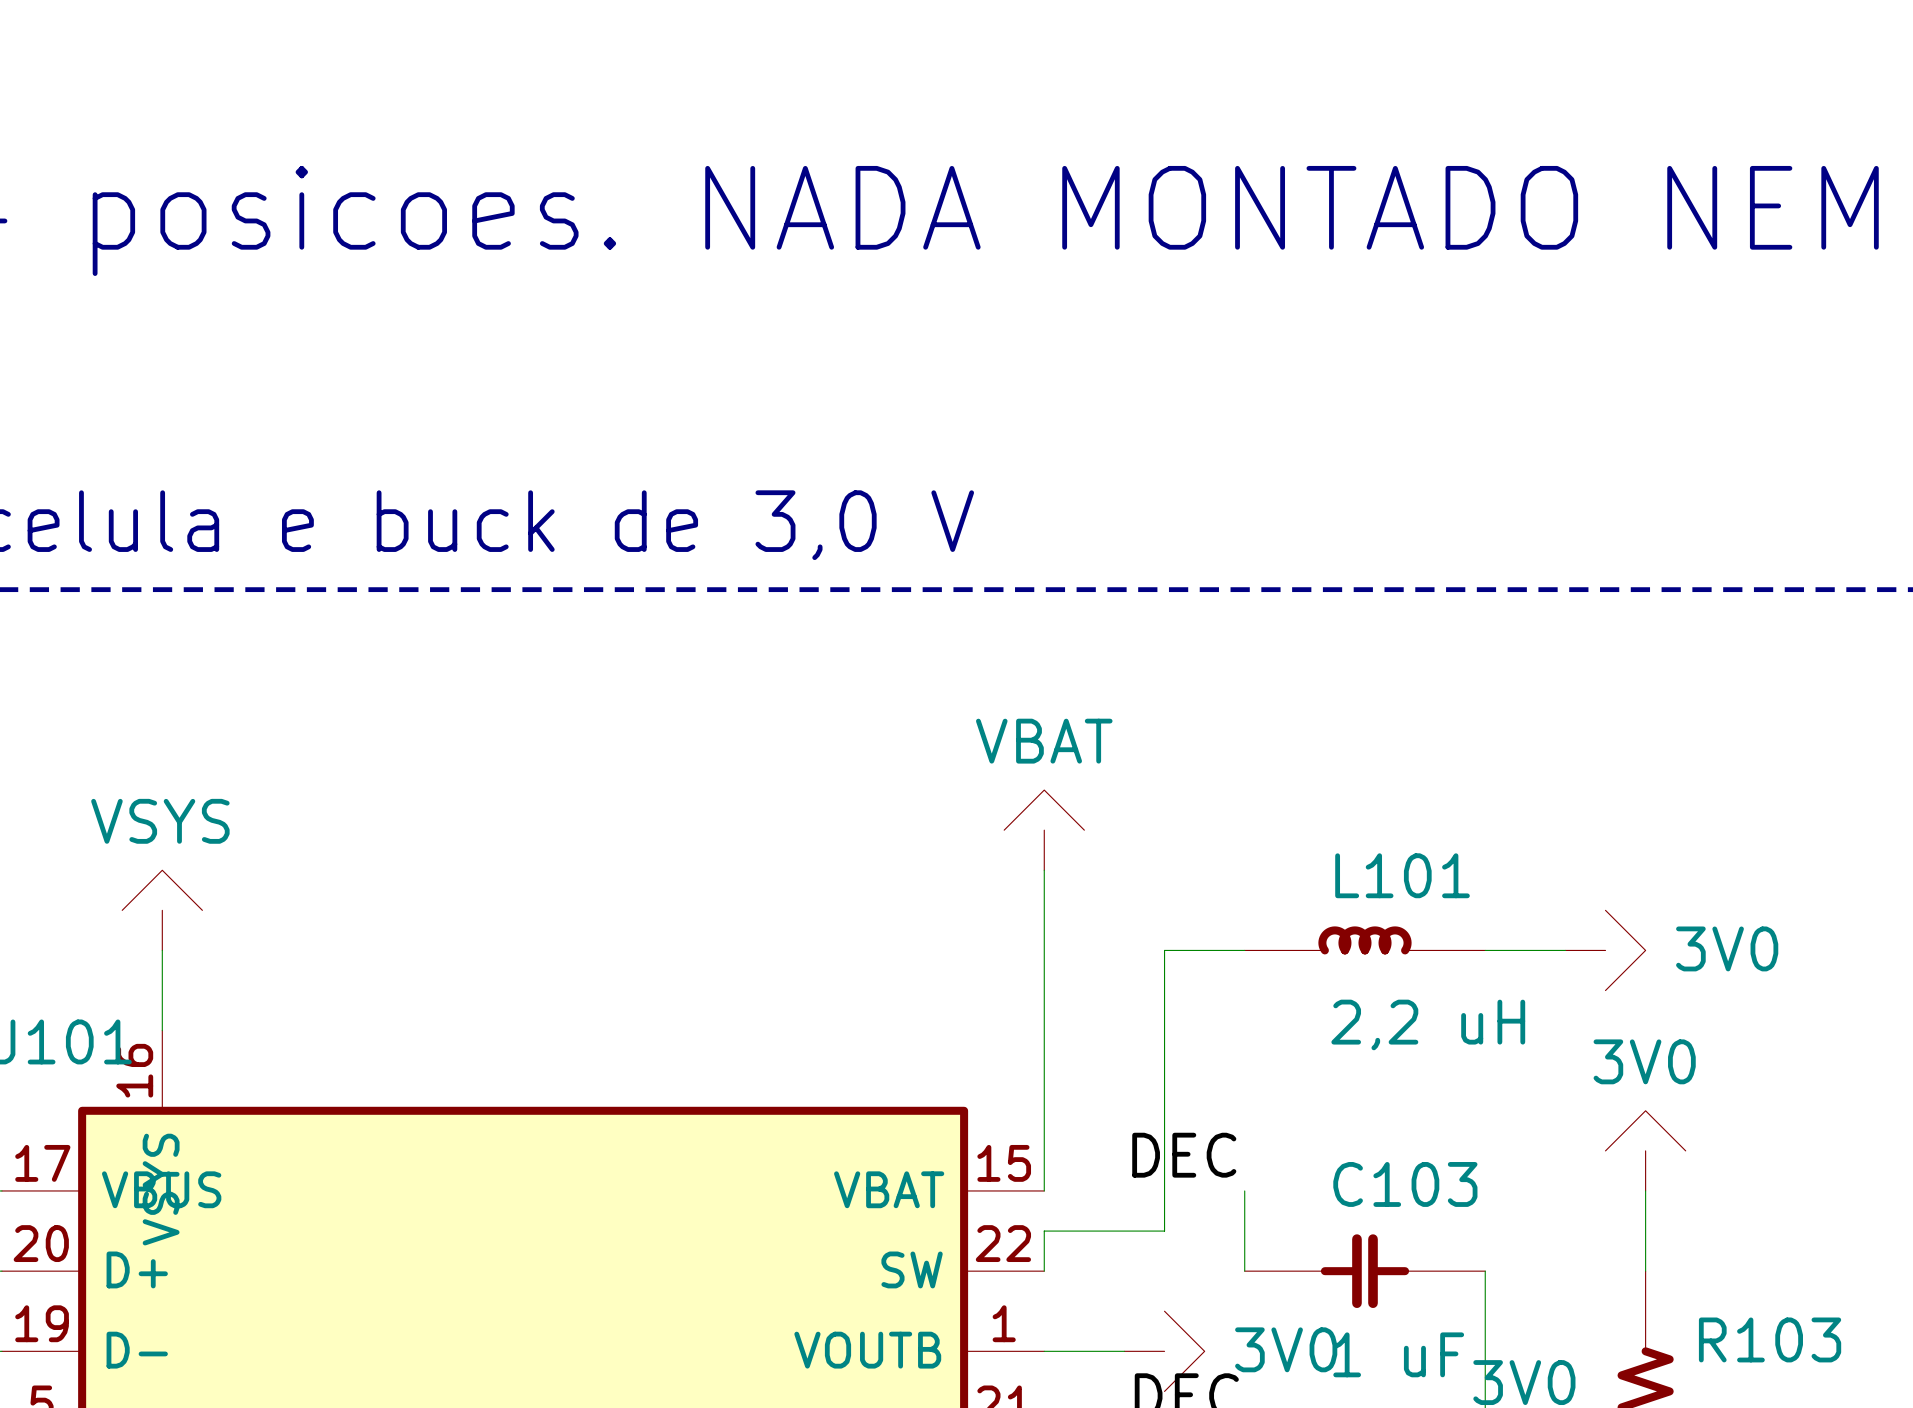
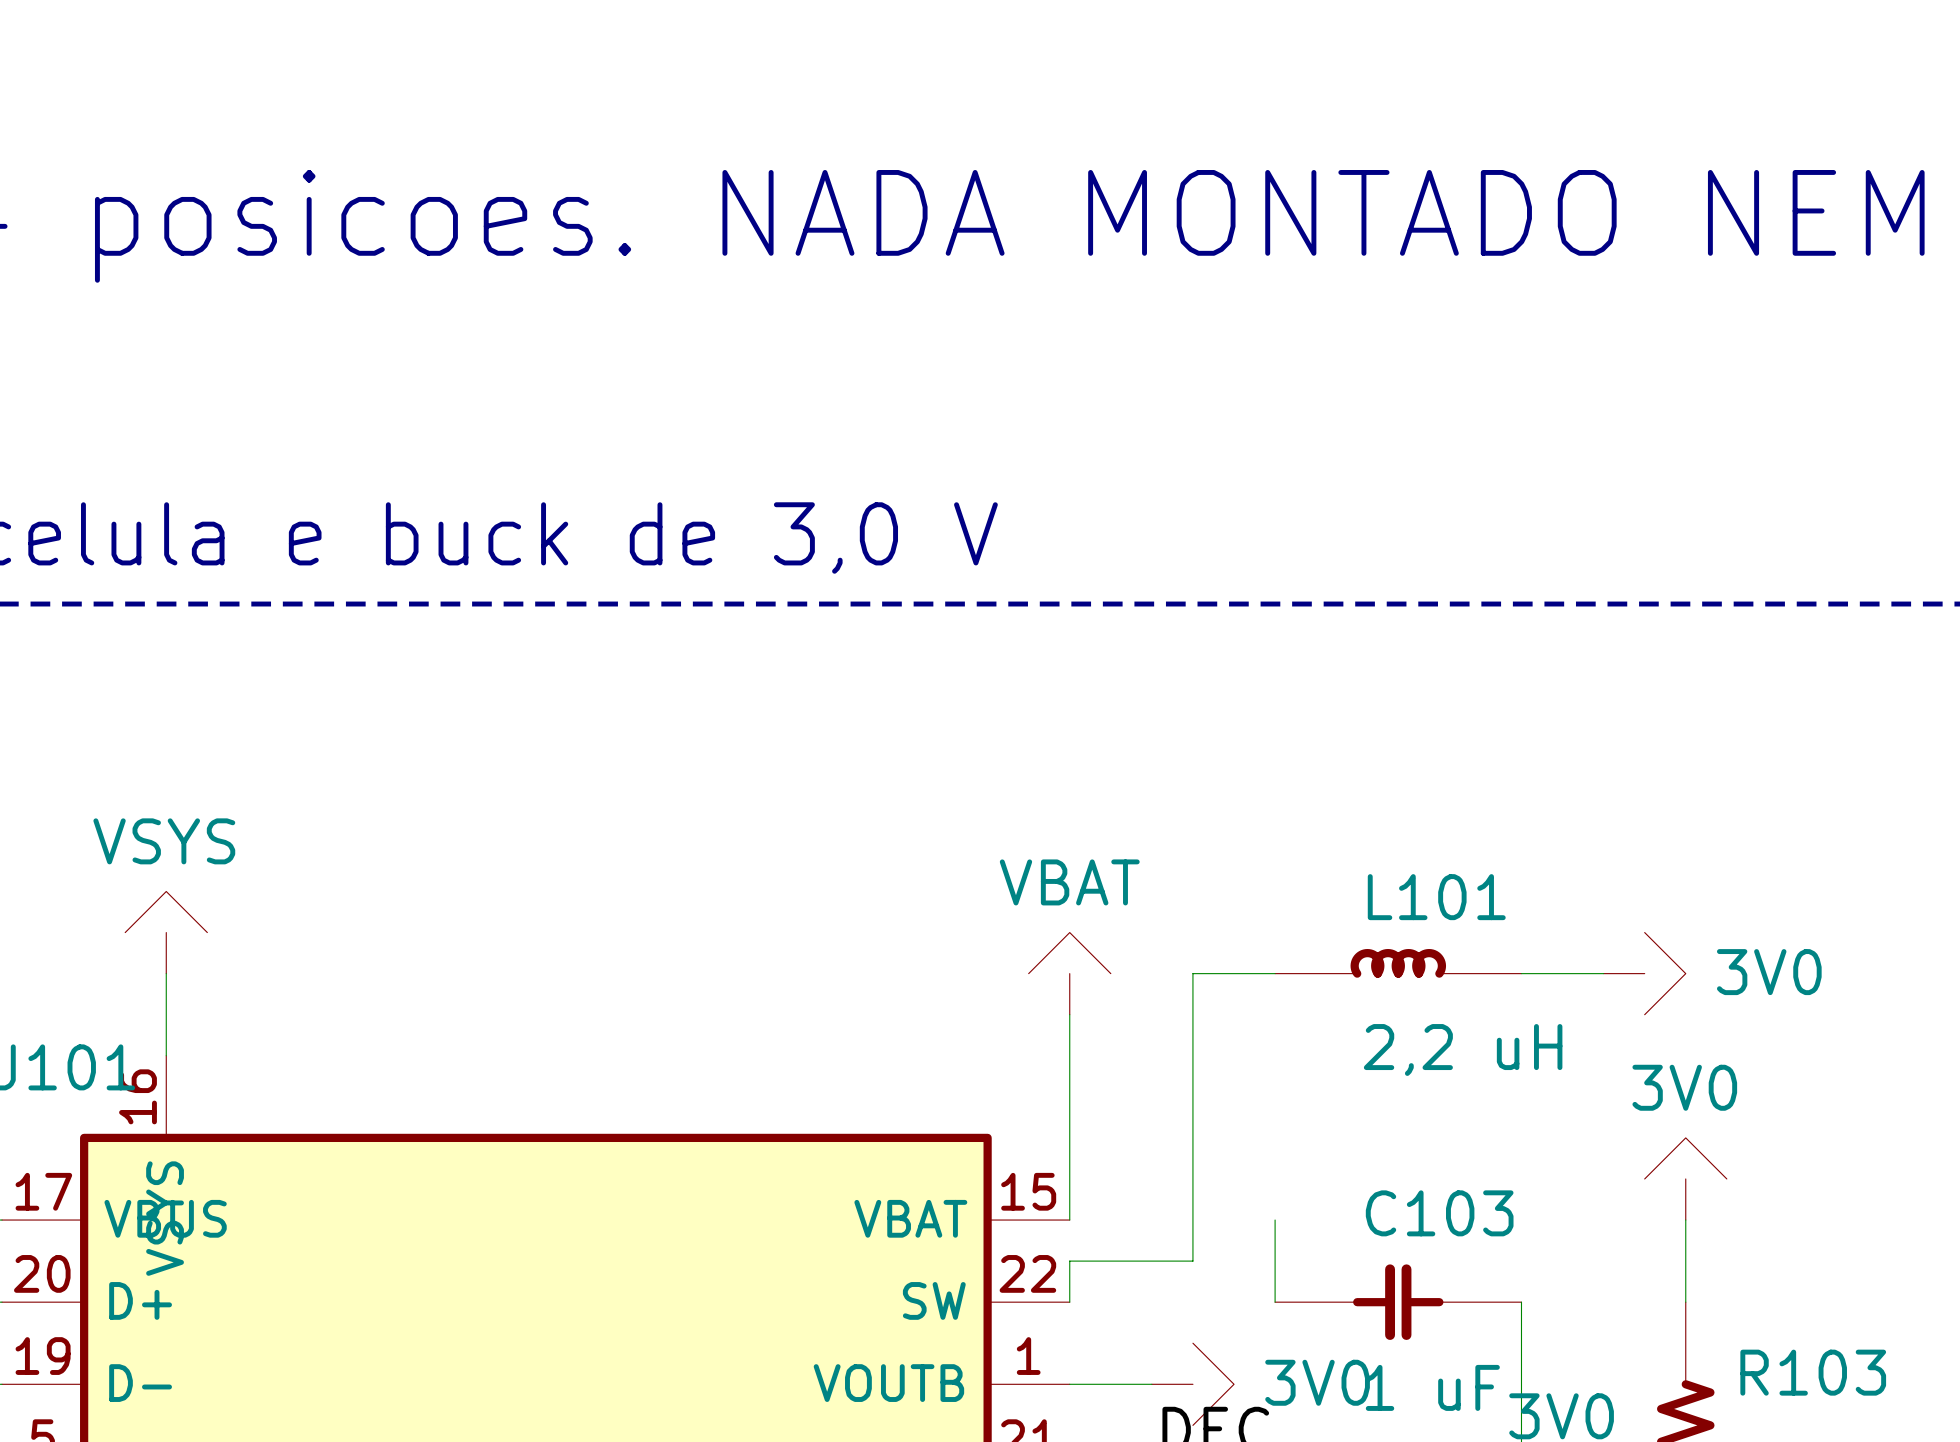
power symbol position: VBAT (1044, 830) -> VBAT (1069, 973)
wire: (1044, 870) (1044, 990) -> none
label: DEC (1184, 1155) -> none

